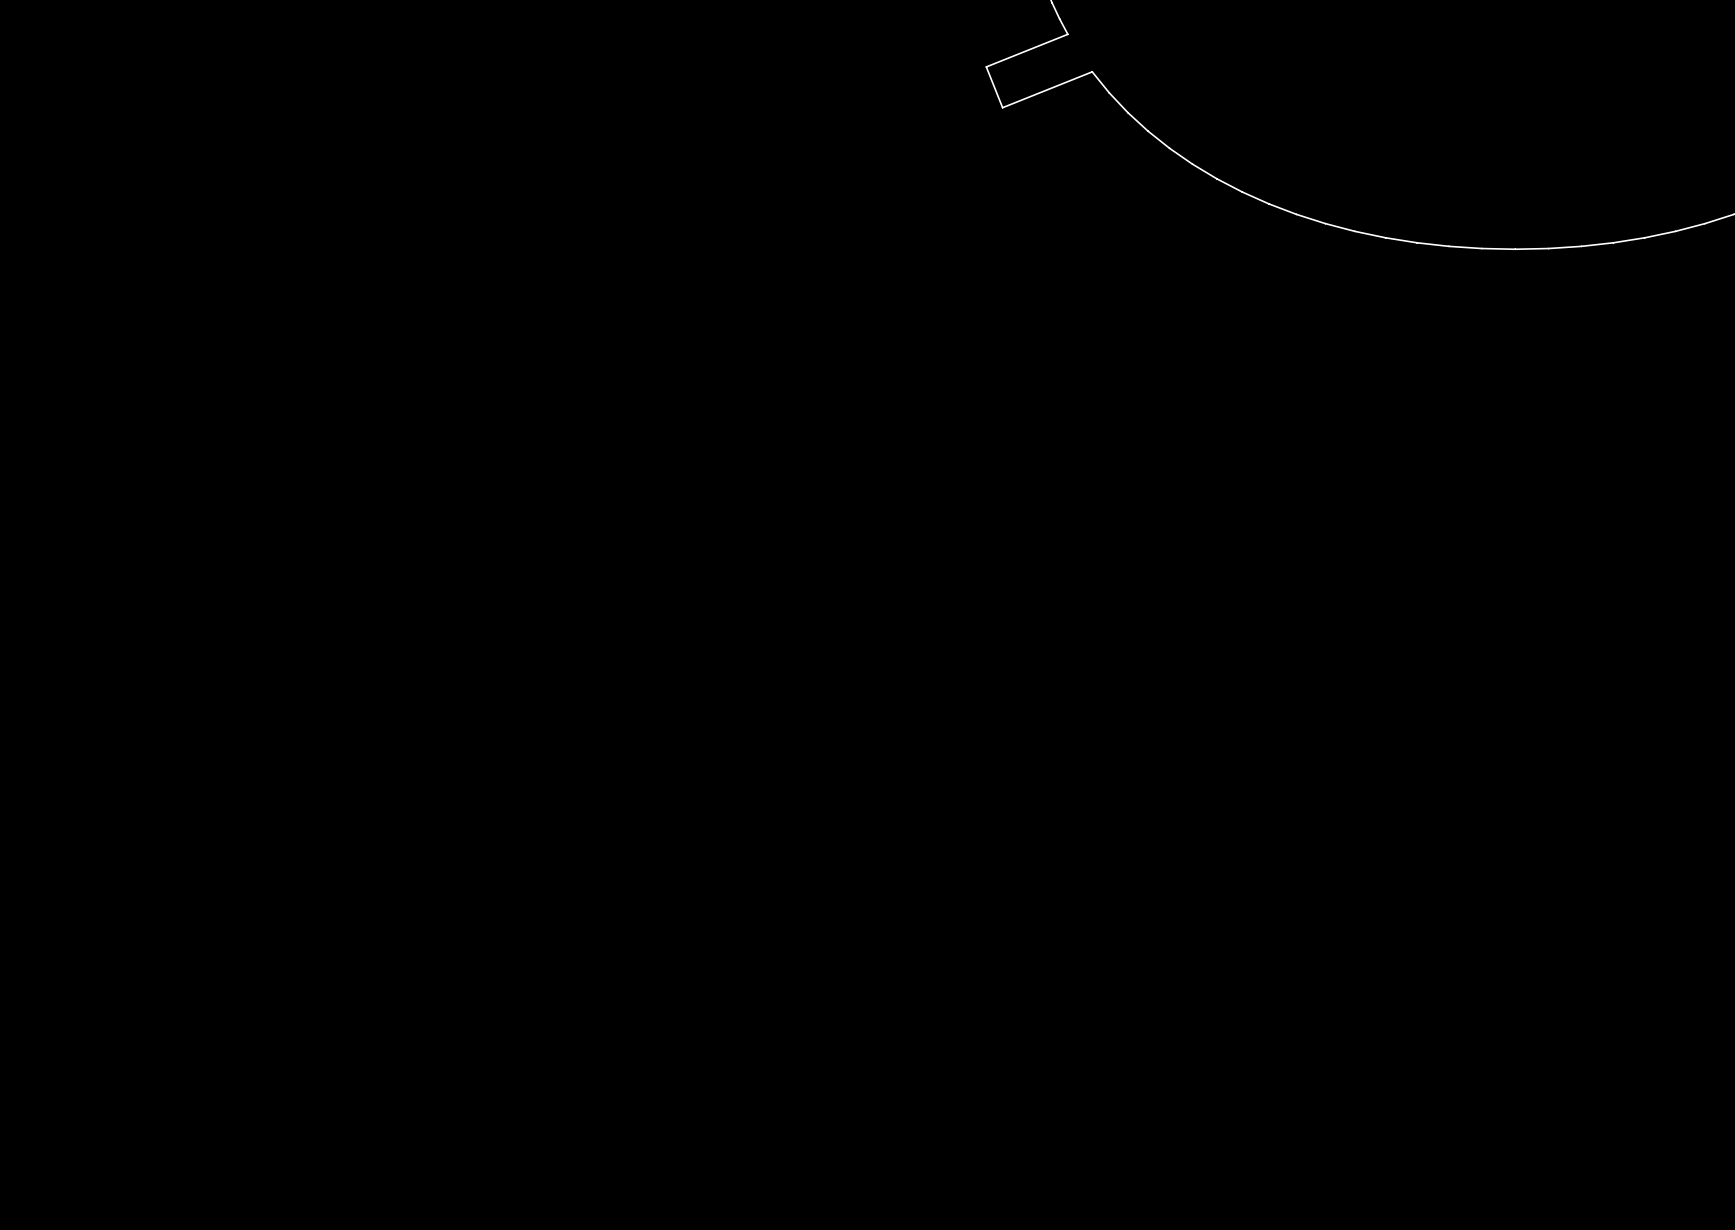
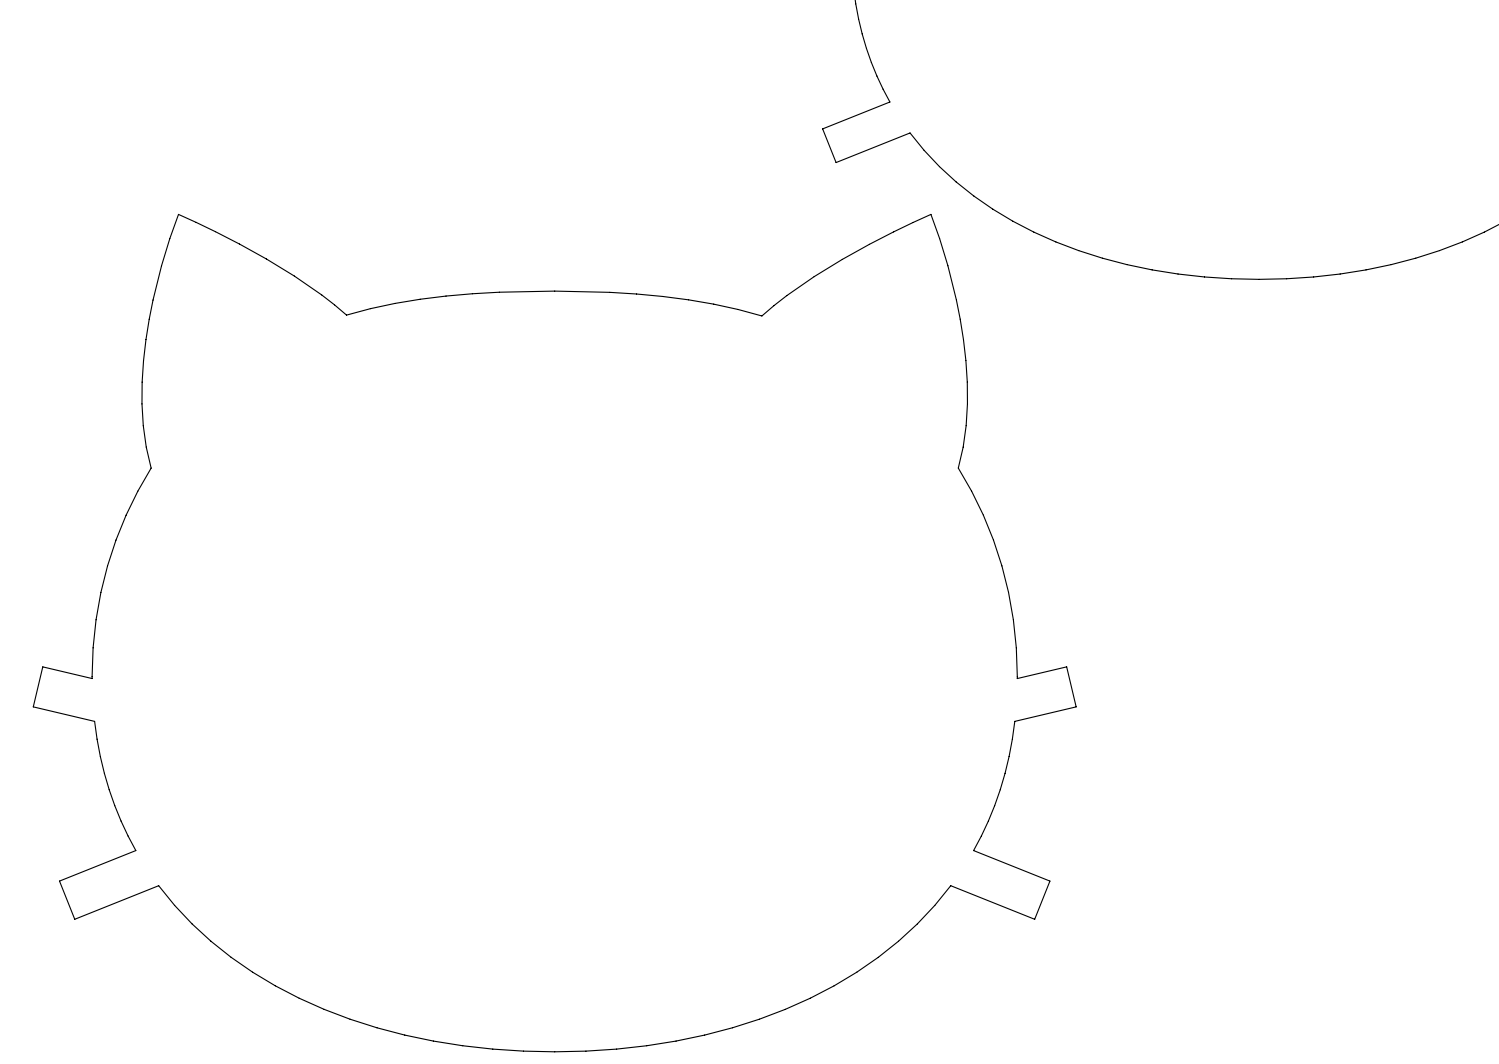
board edge: none -> (178, 214) (161, 265) (153, 300) (143, 360) (143, 425) (151, 468) (126, 515) (107, 565) (96, 619) (92, 678) (42, 666) (33, 706) (94, 721) (100, 756) (109, 789) (121, 821) (135, 850) (59, 881) (74, 919) (158, 885) (192, 923) (231, 957) (275, 985) (324, 1009) (376, 1027) (433, 1041) (492, 1049) (554, 1051) (616, 1049) (676, 1041) (732, 1027) (785, 1009) (834, 985) (878, 957) (917, 923) (950, 885) (1034, 919) (1049, 881) (973, 850) (988, 821) (1000, 789) (1009, 756) (1014, 721) (1076, 706) (1066, 666) (1017, 678) (1013, 619) (1001, 565) (983, 515) (958, 468) (966, 425) (965, 360) (956, 300) (947, 265) (930, 214) (842, 259) (786, 295) (761, 315) (713, 304) (662, 296) (554, 291) (446, 296) (394, 303) (346, 315) (321, 294) (266, 258) (178, 214)

